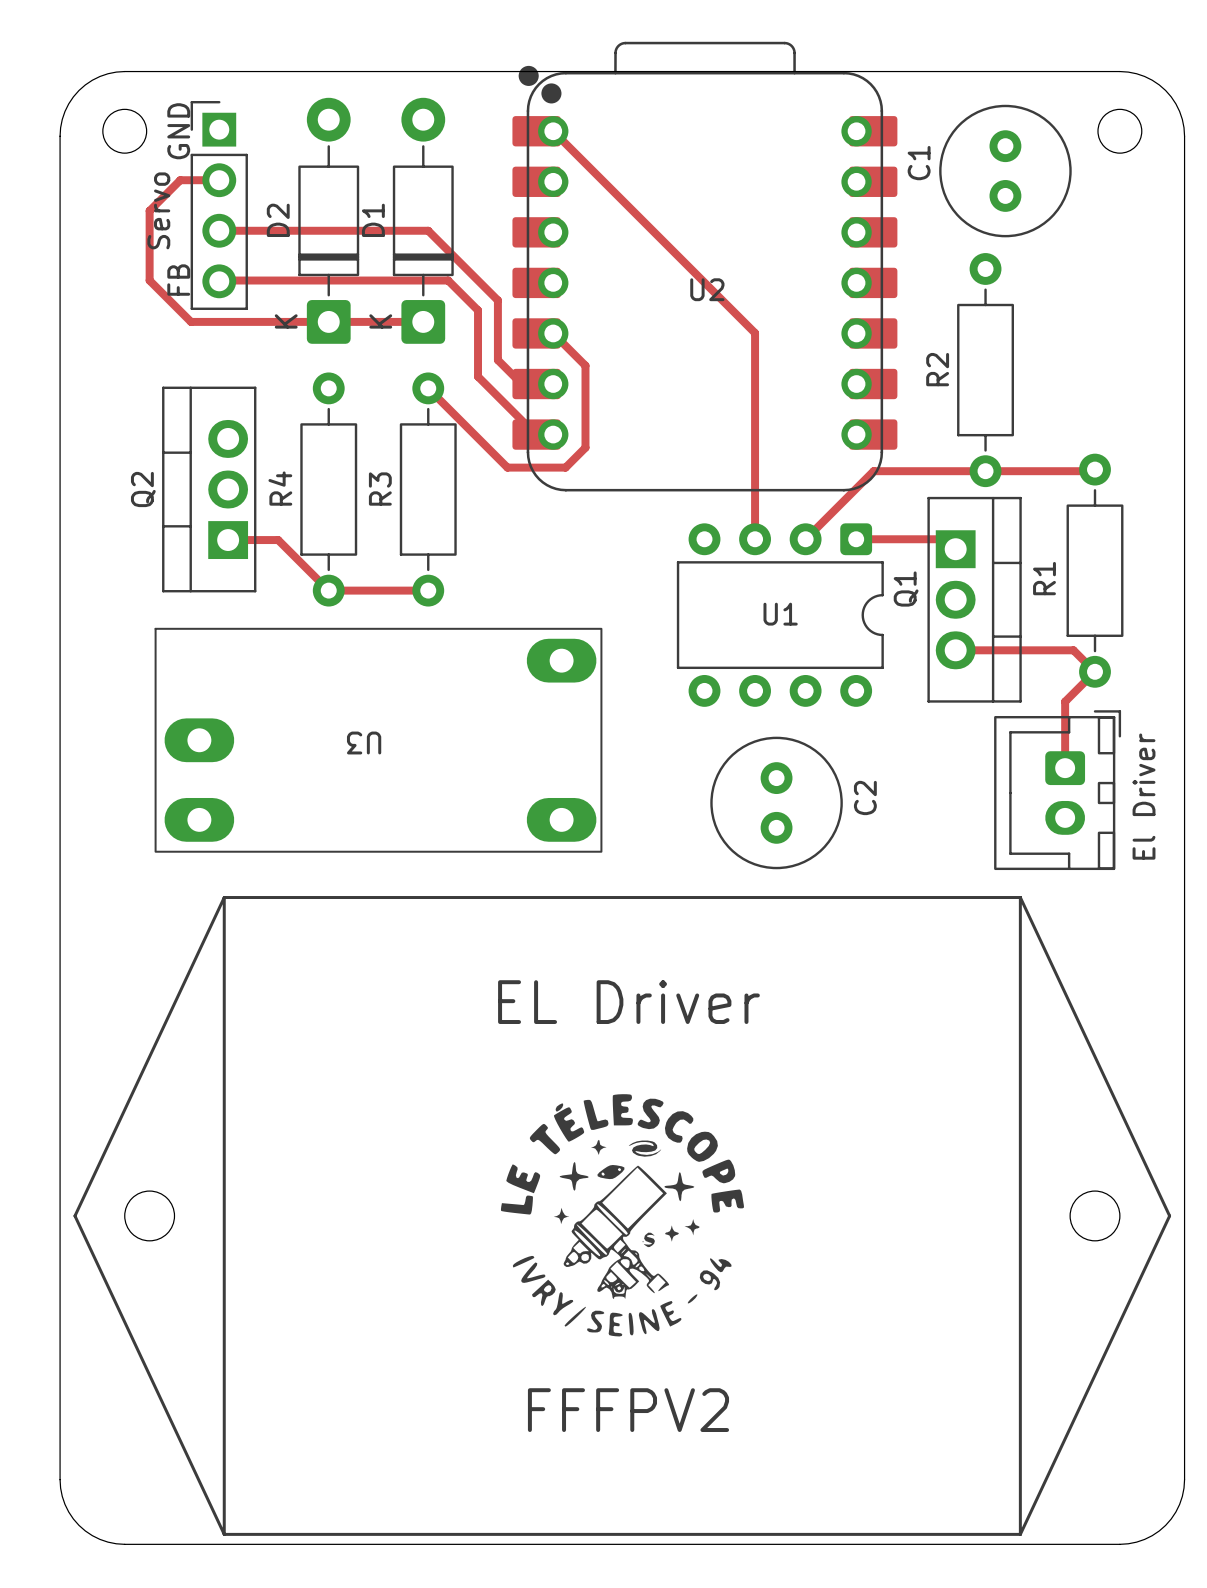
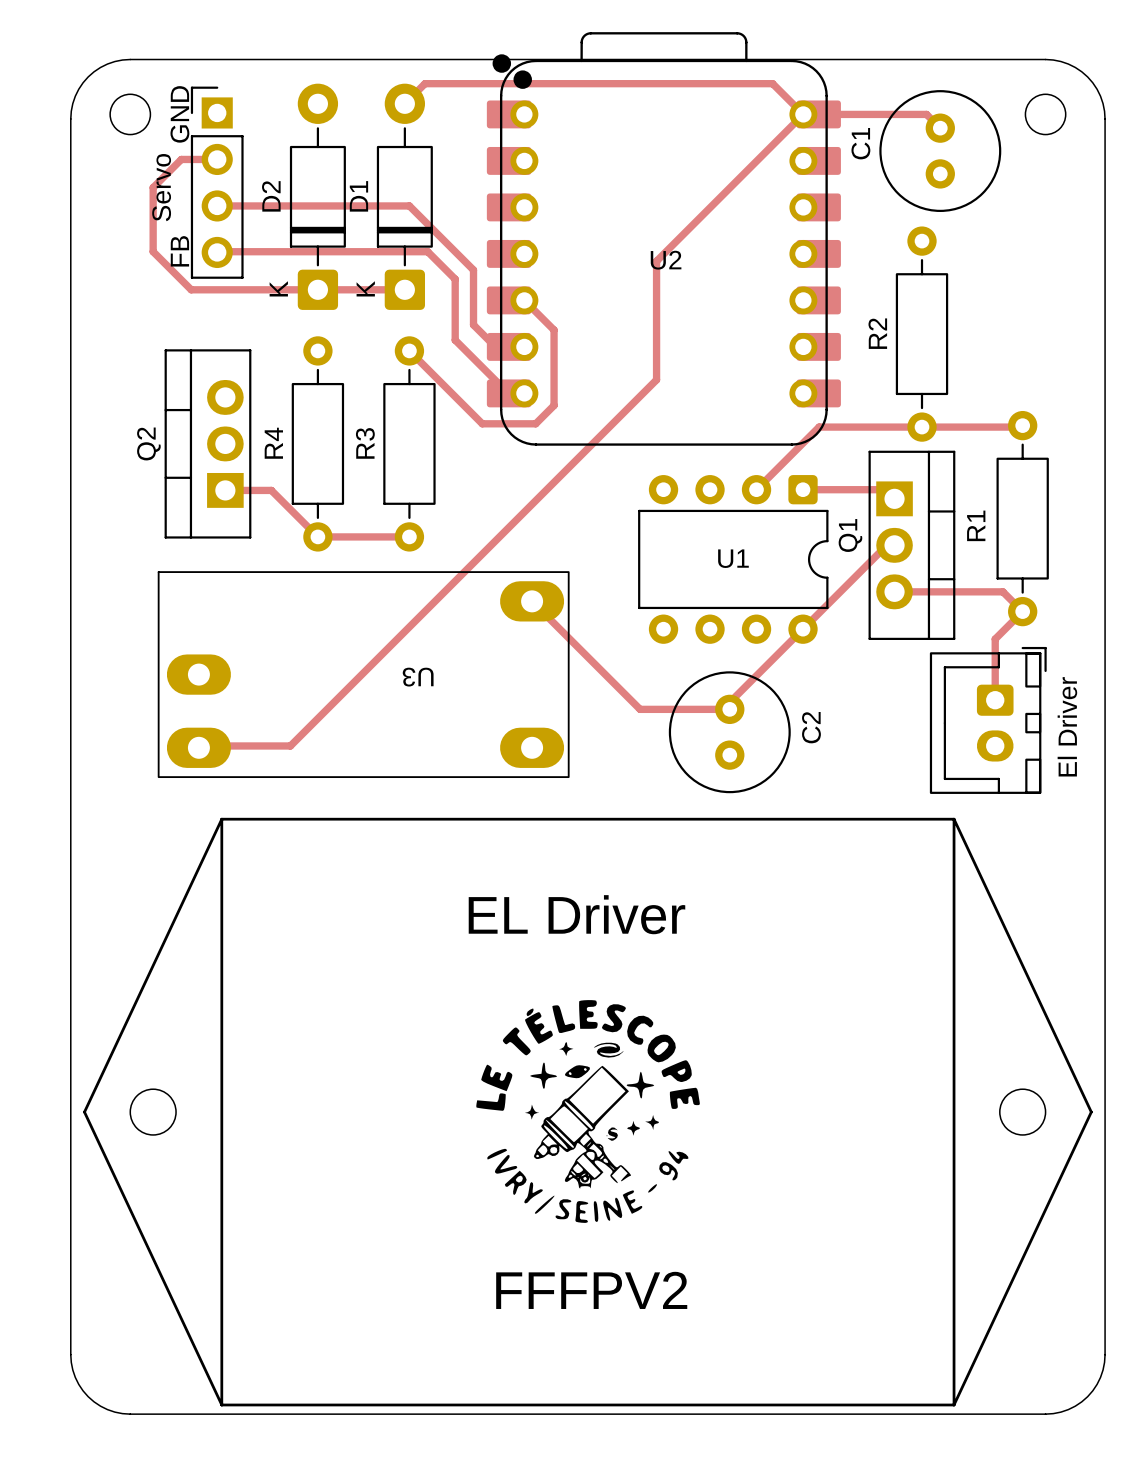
track: none -> (404, 103) (425, 83) (772, 83) (803, 114)
track: (553, 131) (755, 333) (755, 539) -> none
track: none -> (803, 114) (656, 261) (656, 379) (290, 745) (200, 745) (198, 747)
track: none -> (803, 114) (926, 114) (940, 128)
track: none -> (894, 545) (886, 545) (722, 709)
track: none -> (532, 601) (640, 709) (729, 709)
U3 name position: U3 (364, 743) -> U3 (418, 677)

